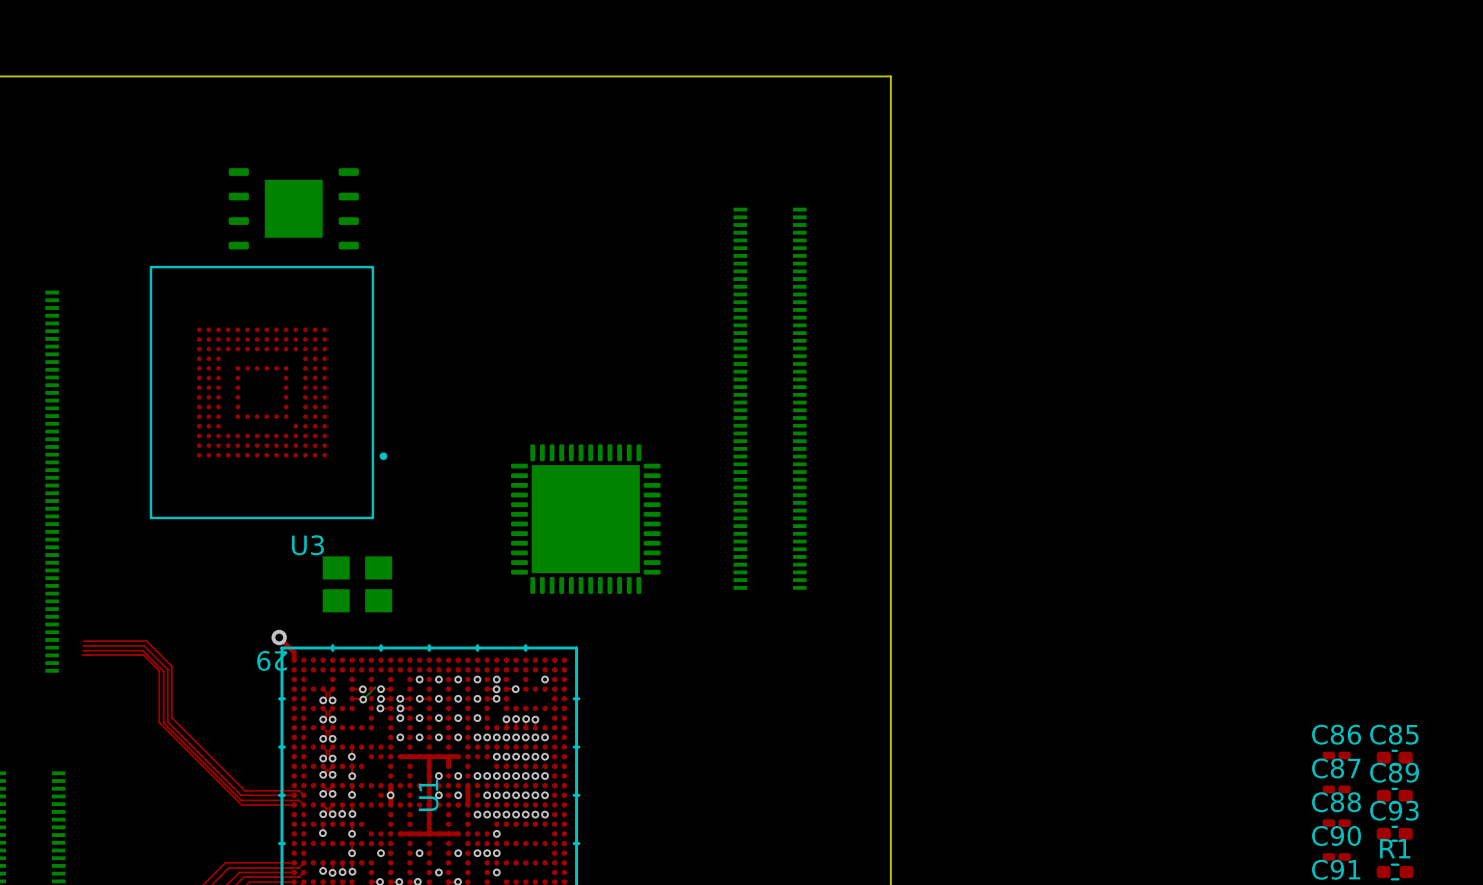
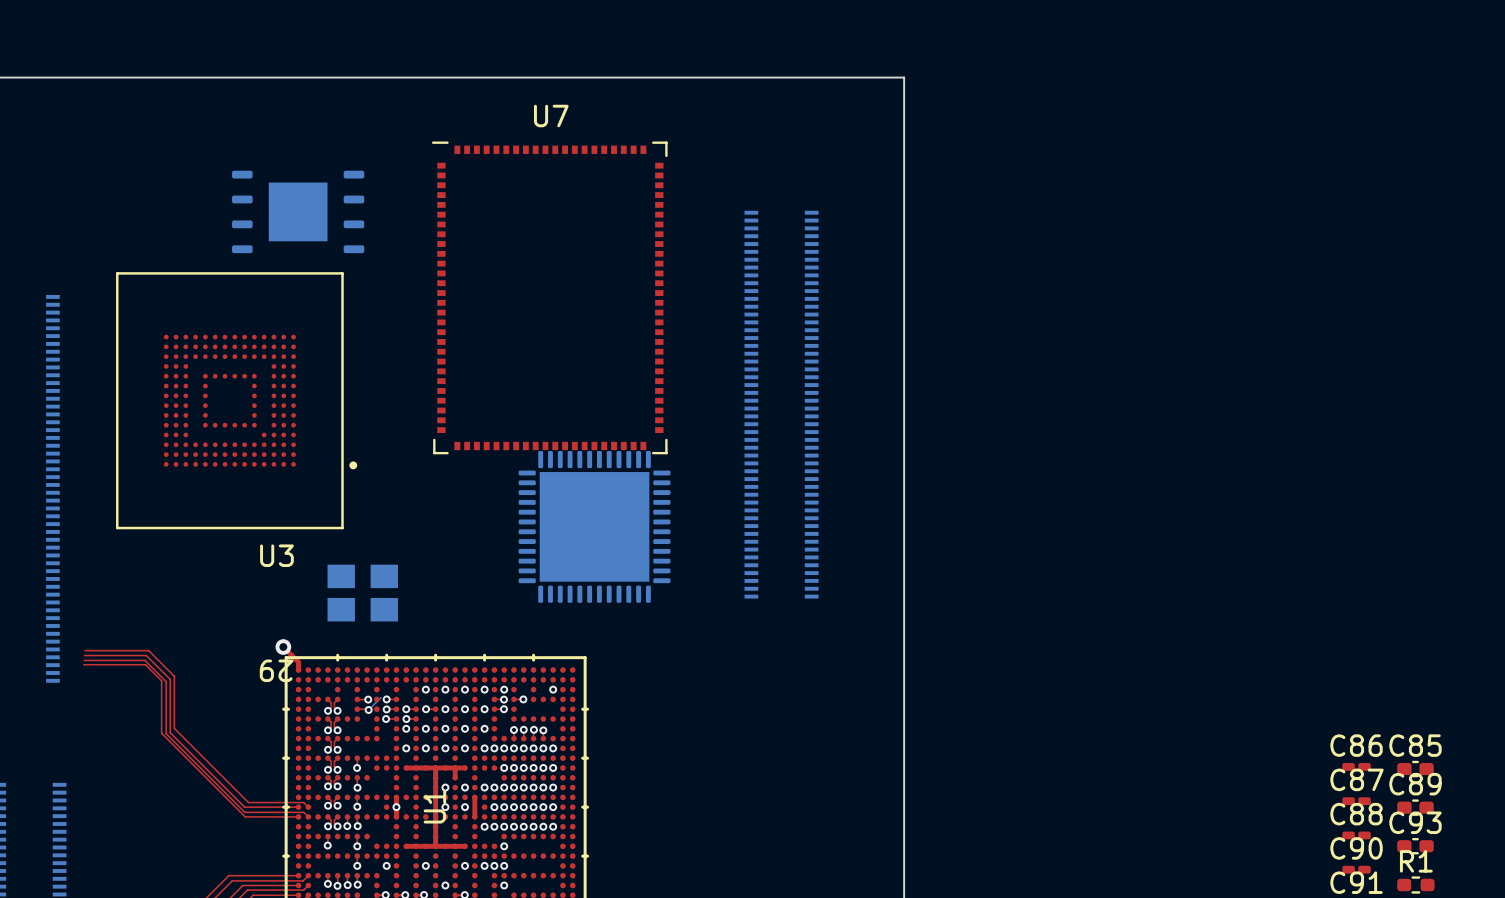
U7: none -> (549, 297)
U3 position: (268, 392) -> (236, 400)

